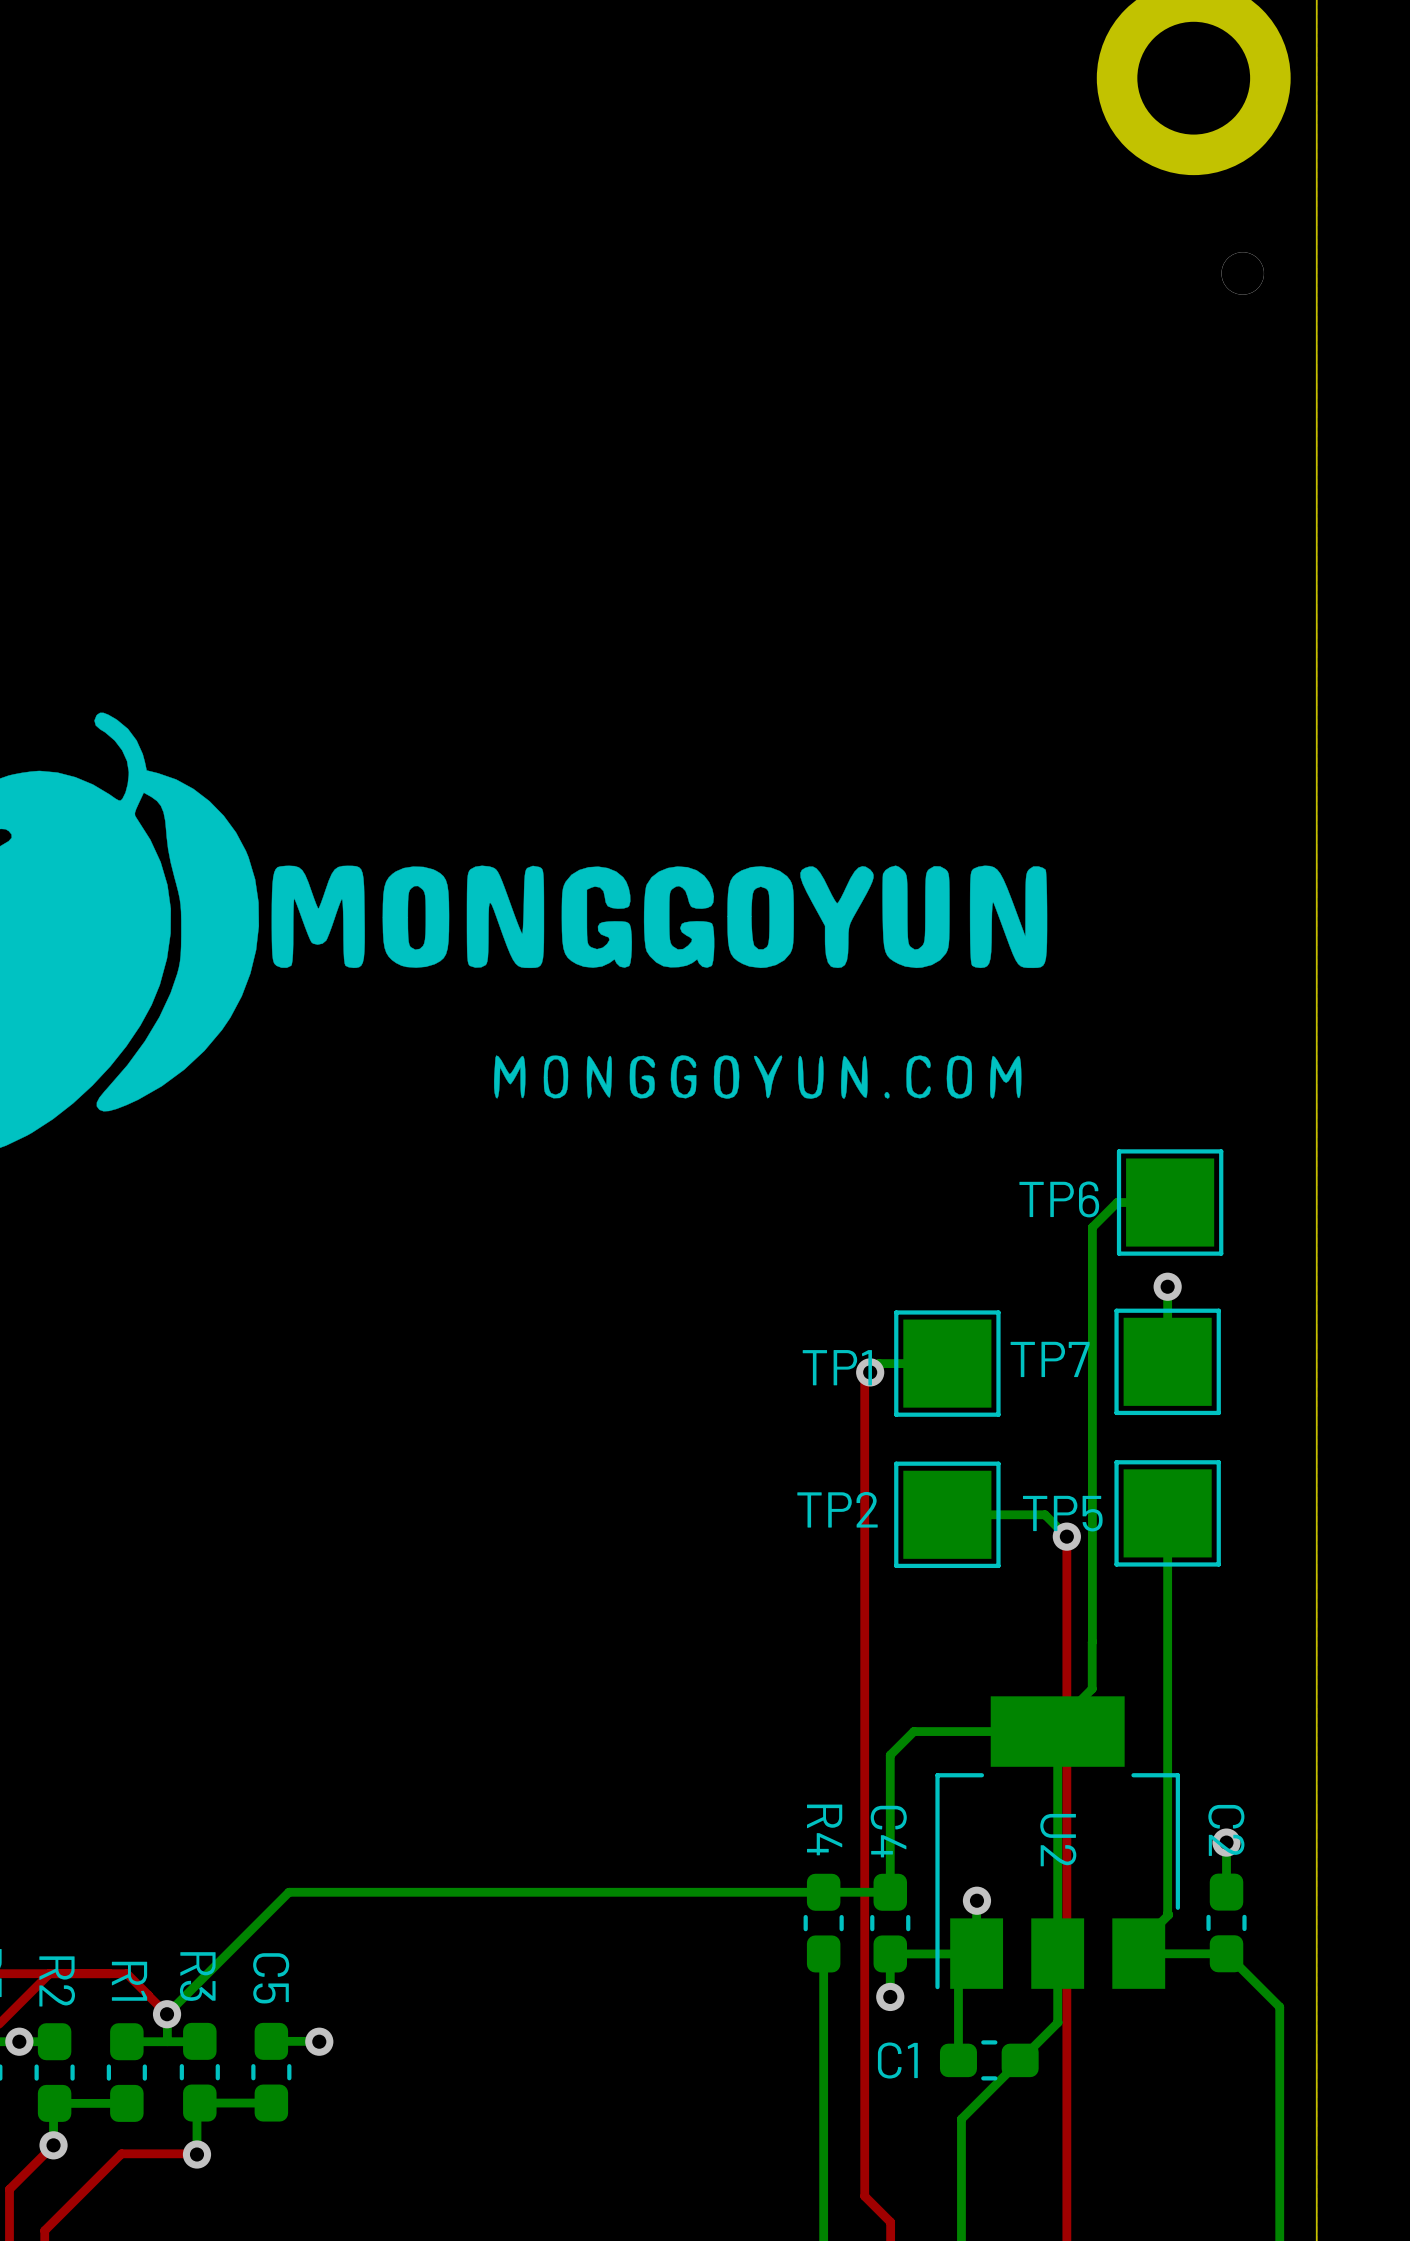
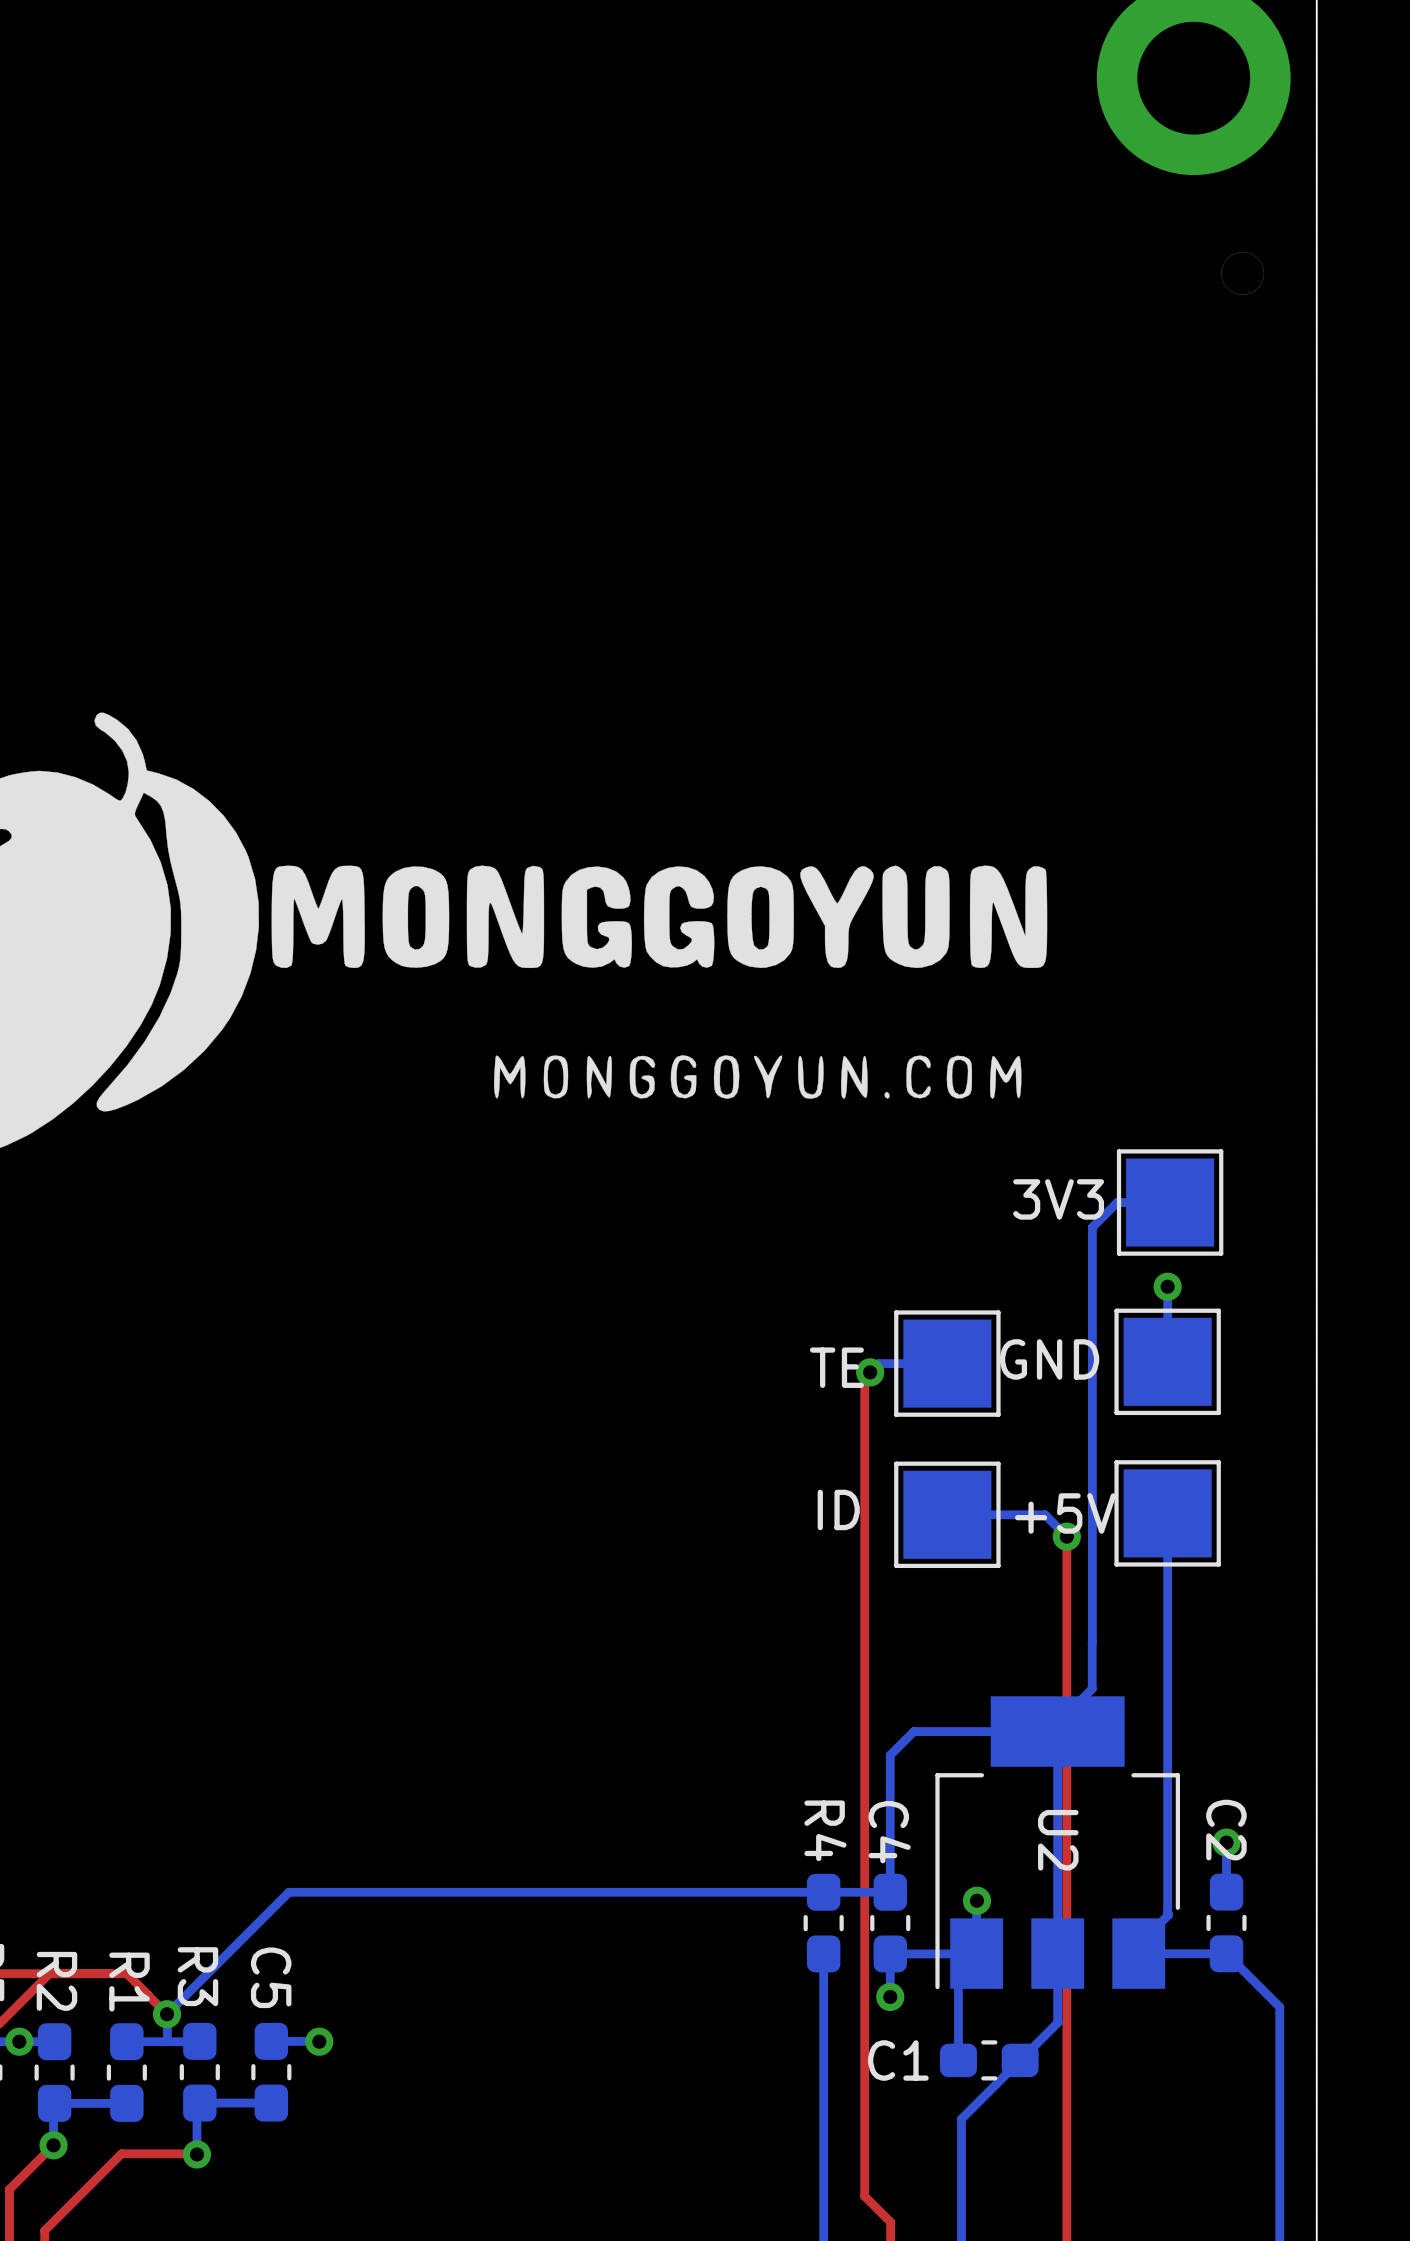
TP6 name: TP6 (1059, 1199) -> 3V3 (1058, 1199)
TP7 name: TP7 (1050, 1359) -> GND (1049, 1359)
TP1 name: TP1 (837, 1367) -> TE (836, 1367)
TP2 name: TP2 (837, 1509) -> ID (838, 1509)
TP5 name: TP5 (1062, 1513) -> +5V (1065, 1513)

